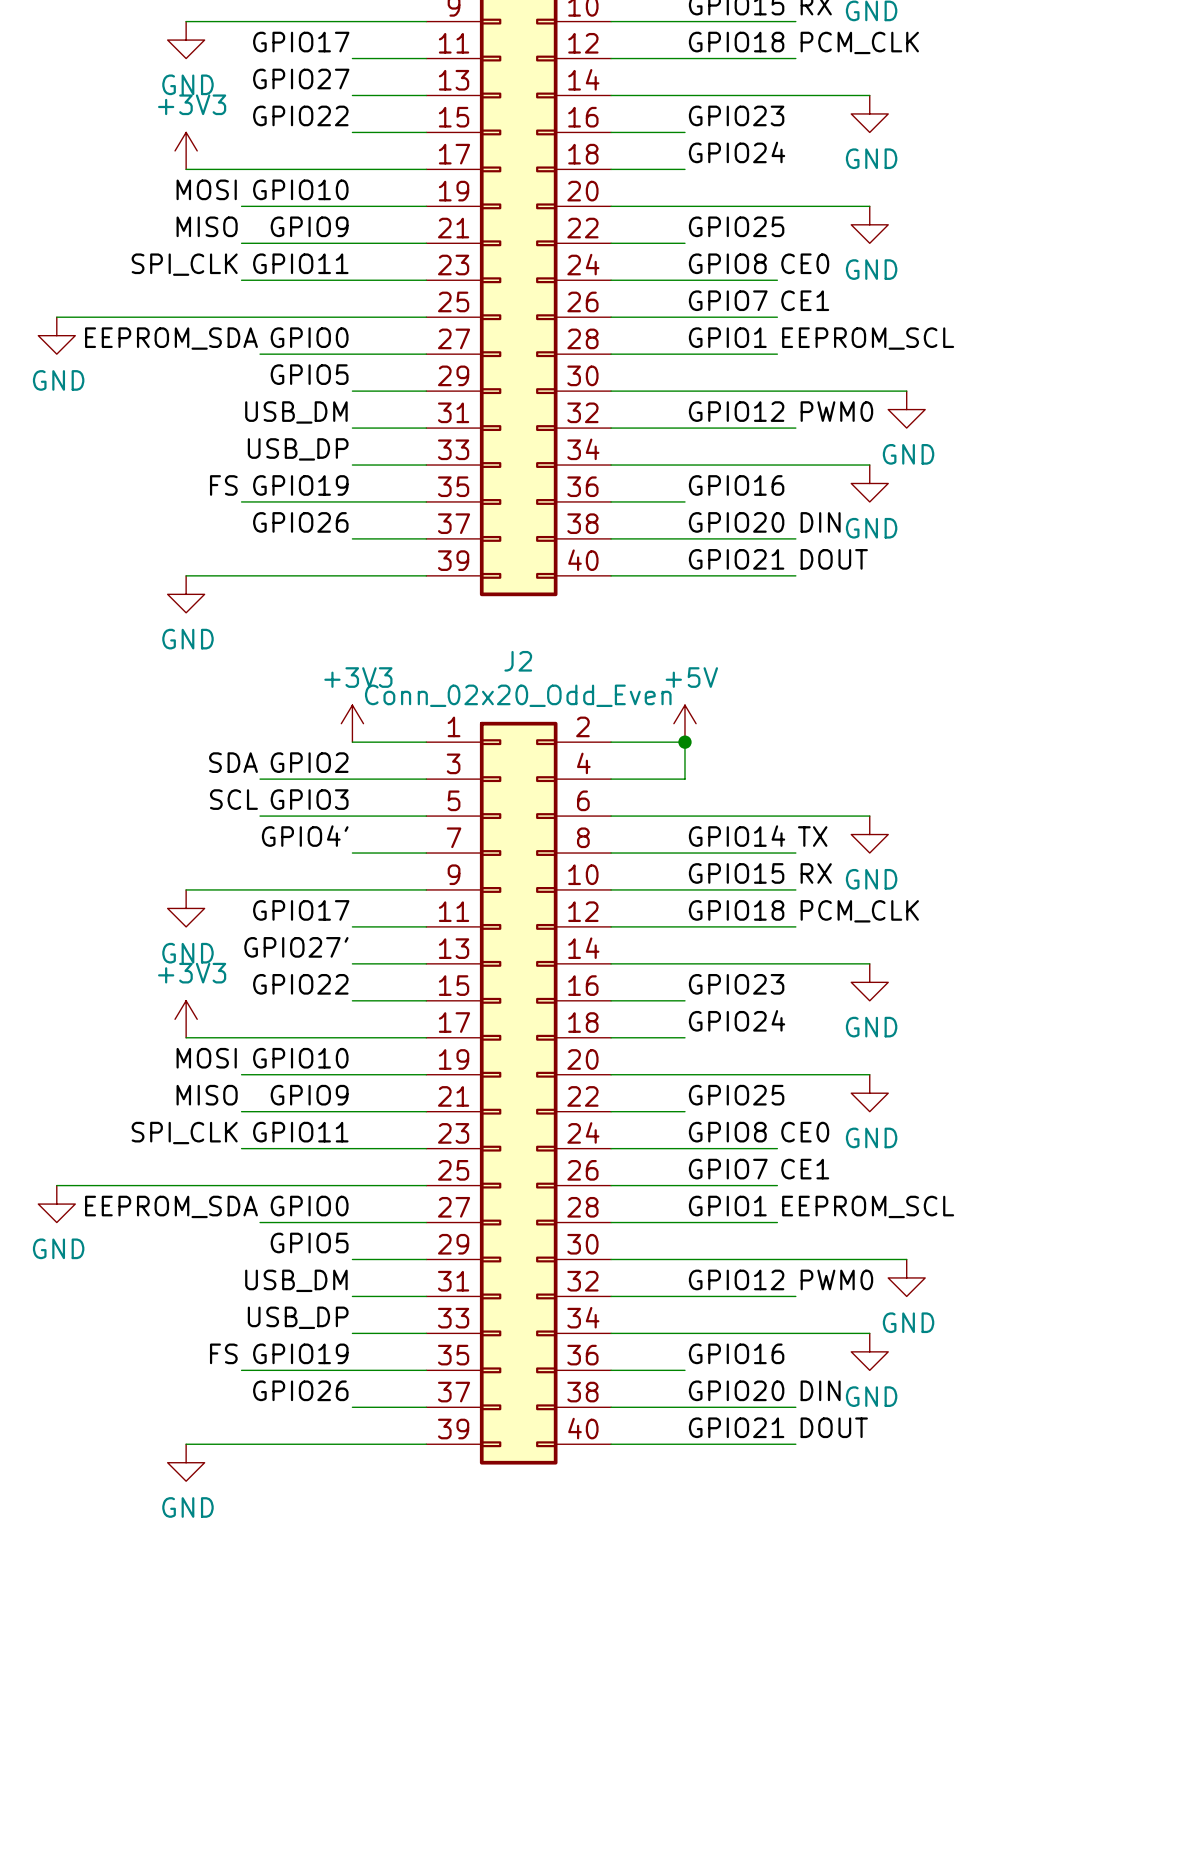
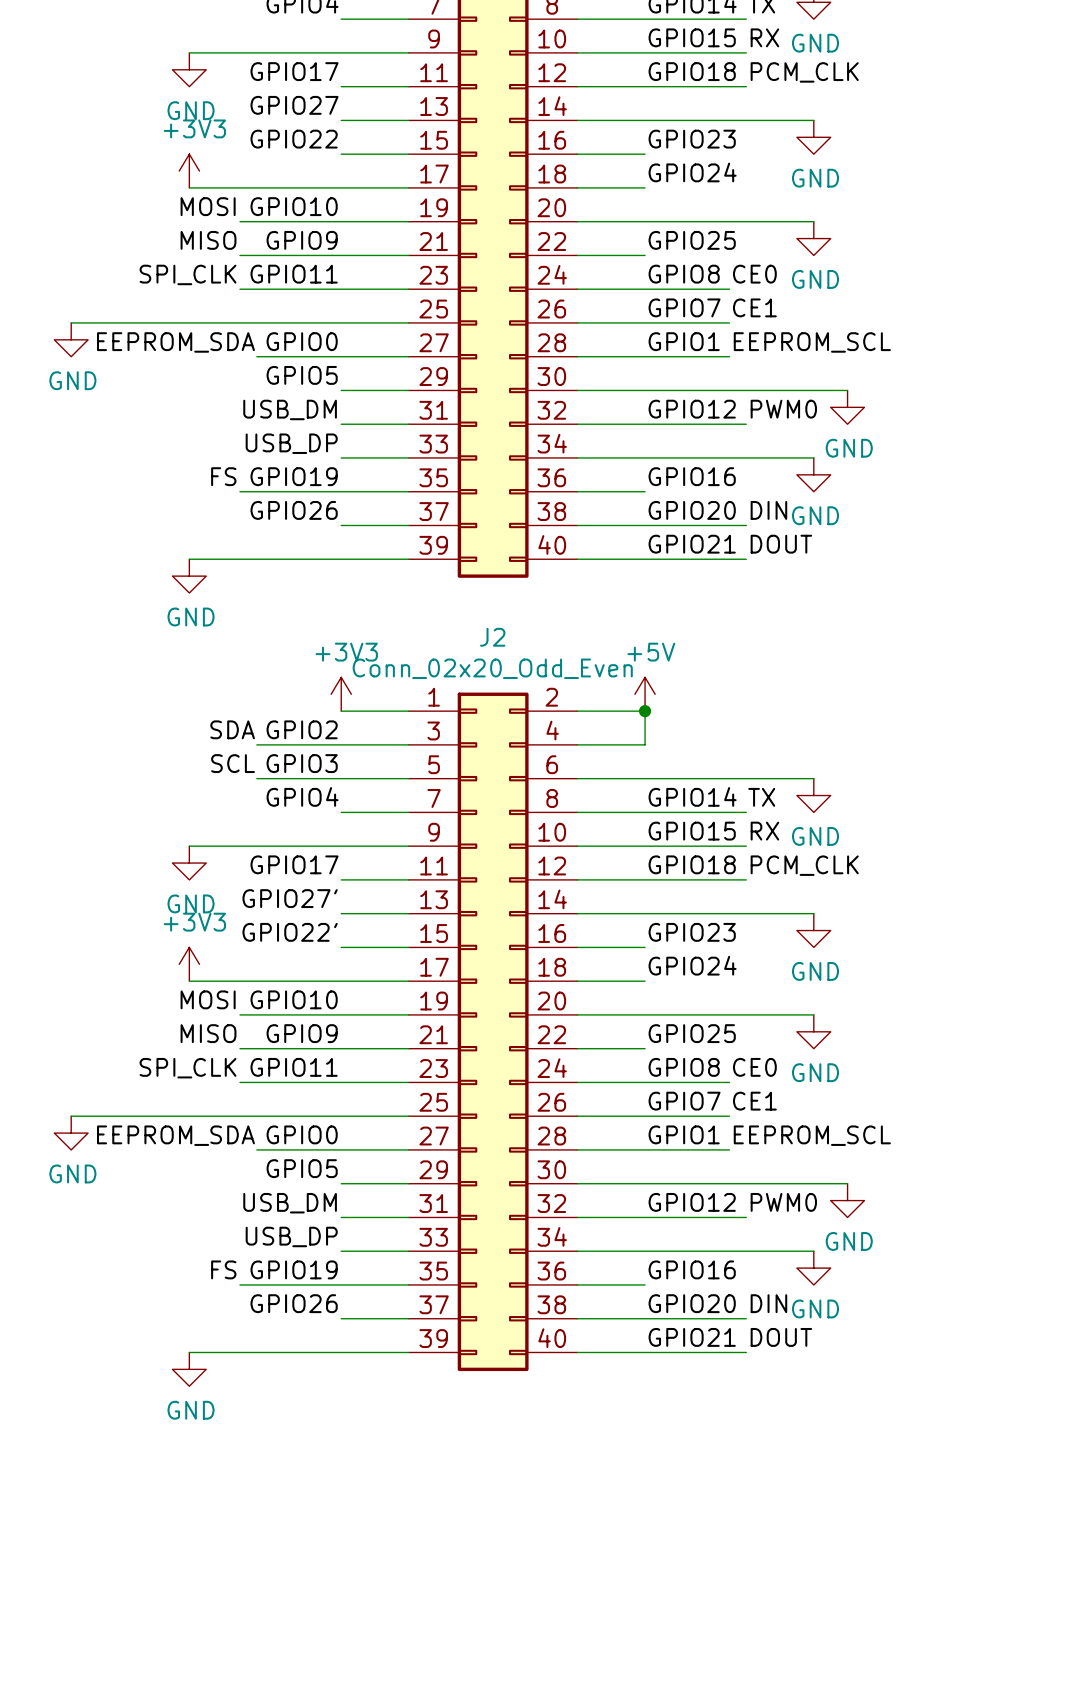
label: GPIO4' (305, 836) -> GPIO4 (302, 796)
label: GPIO22 (300, 984) -> GPIO22' (290, 932)

